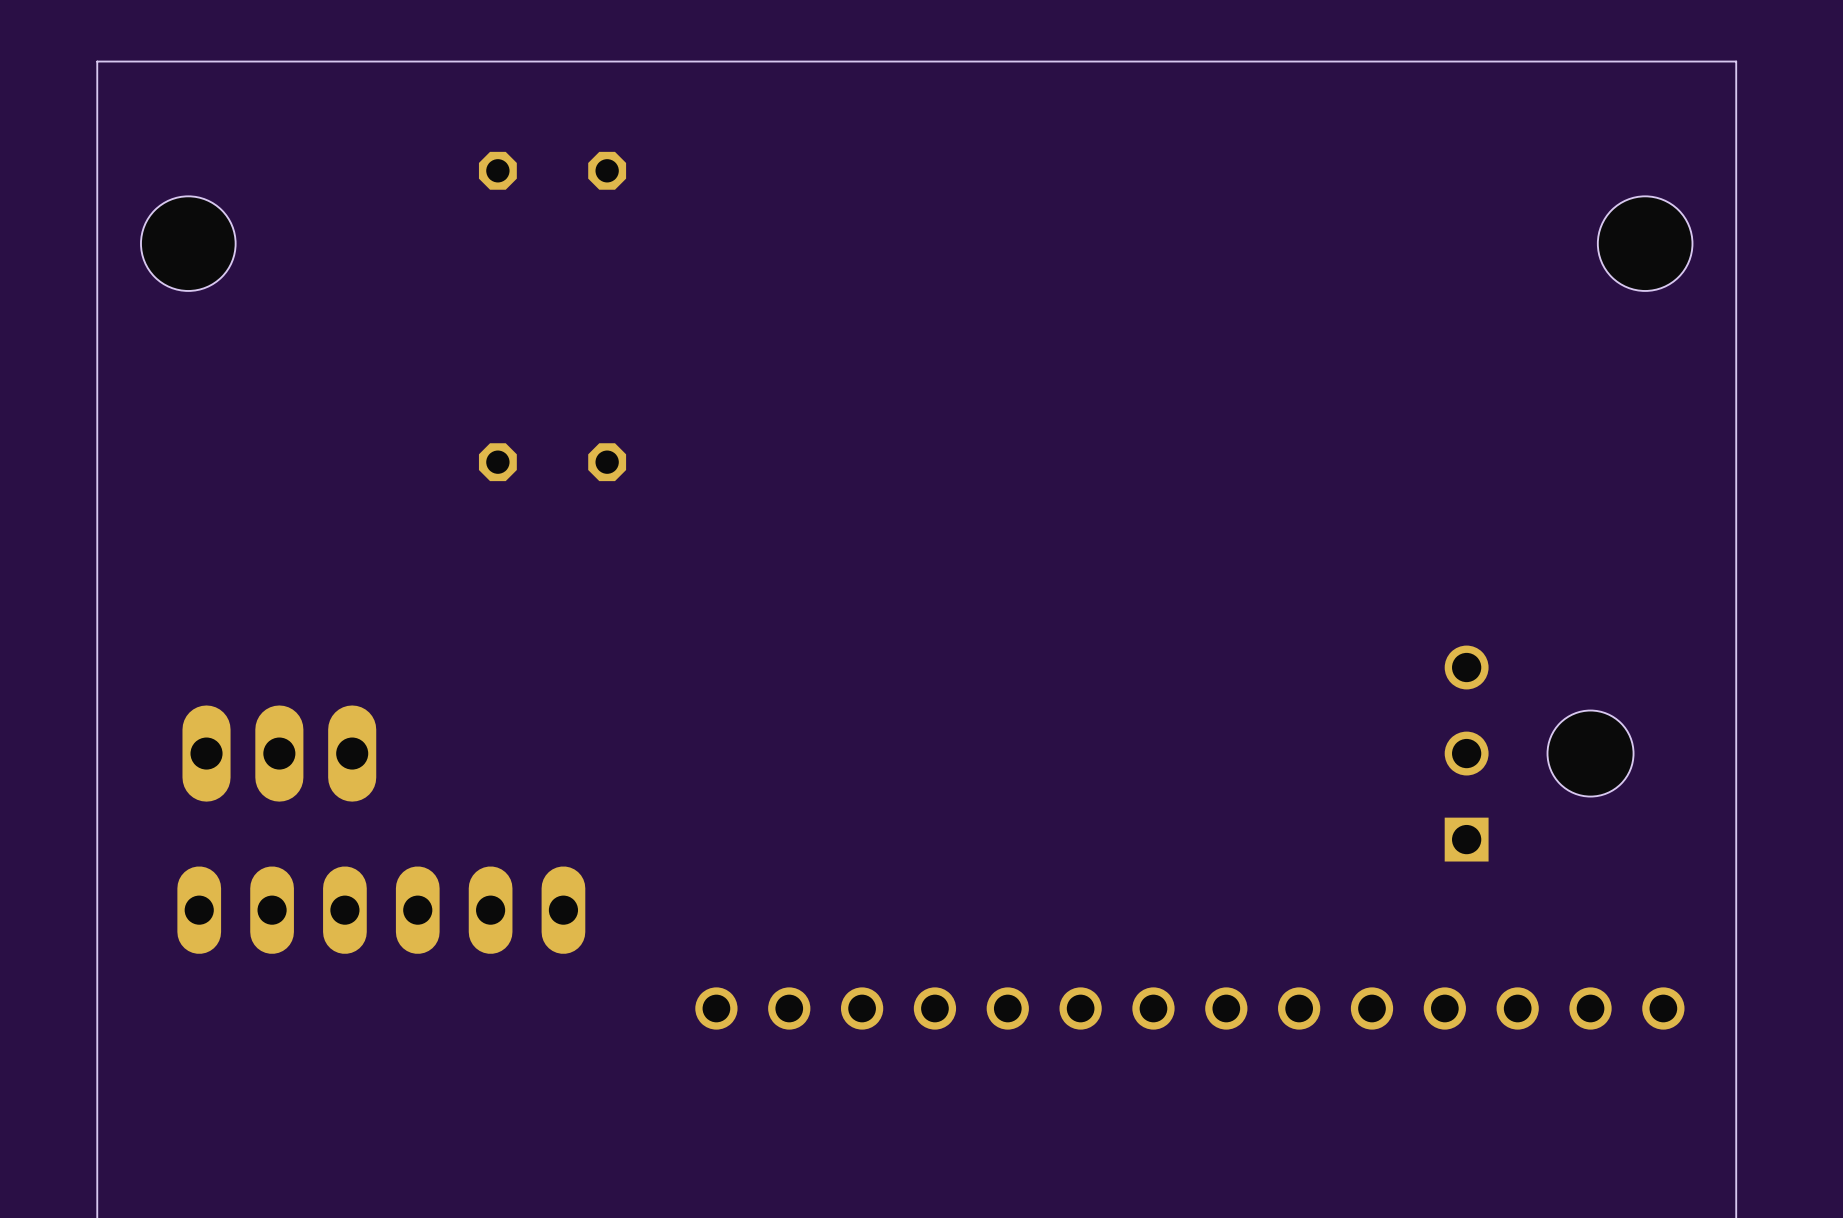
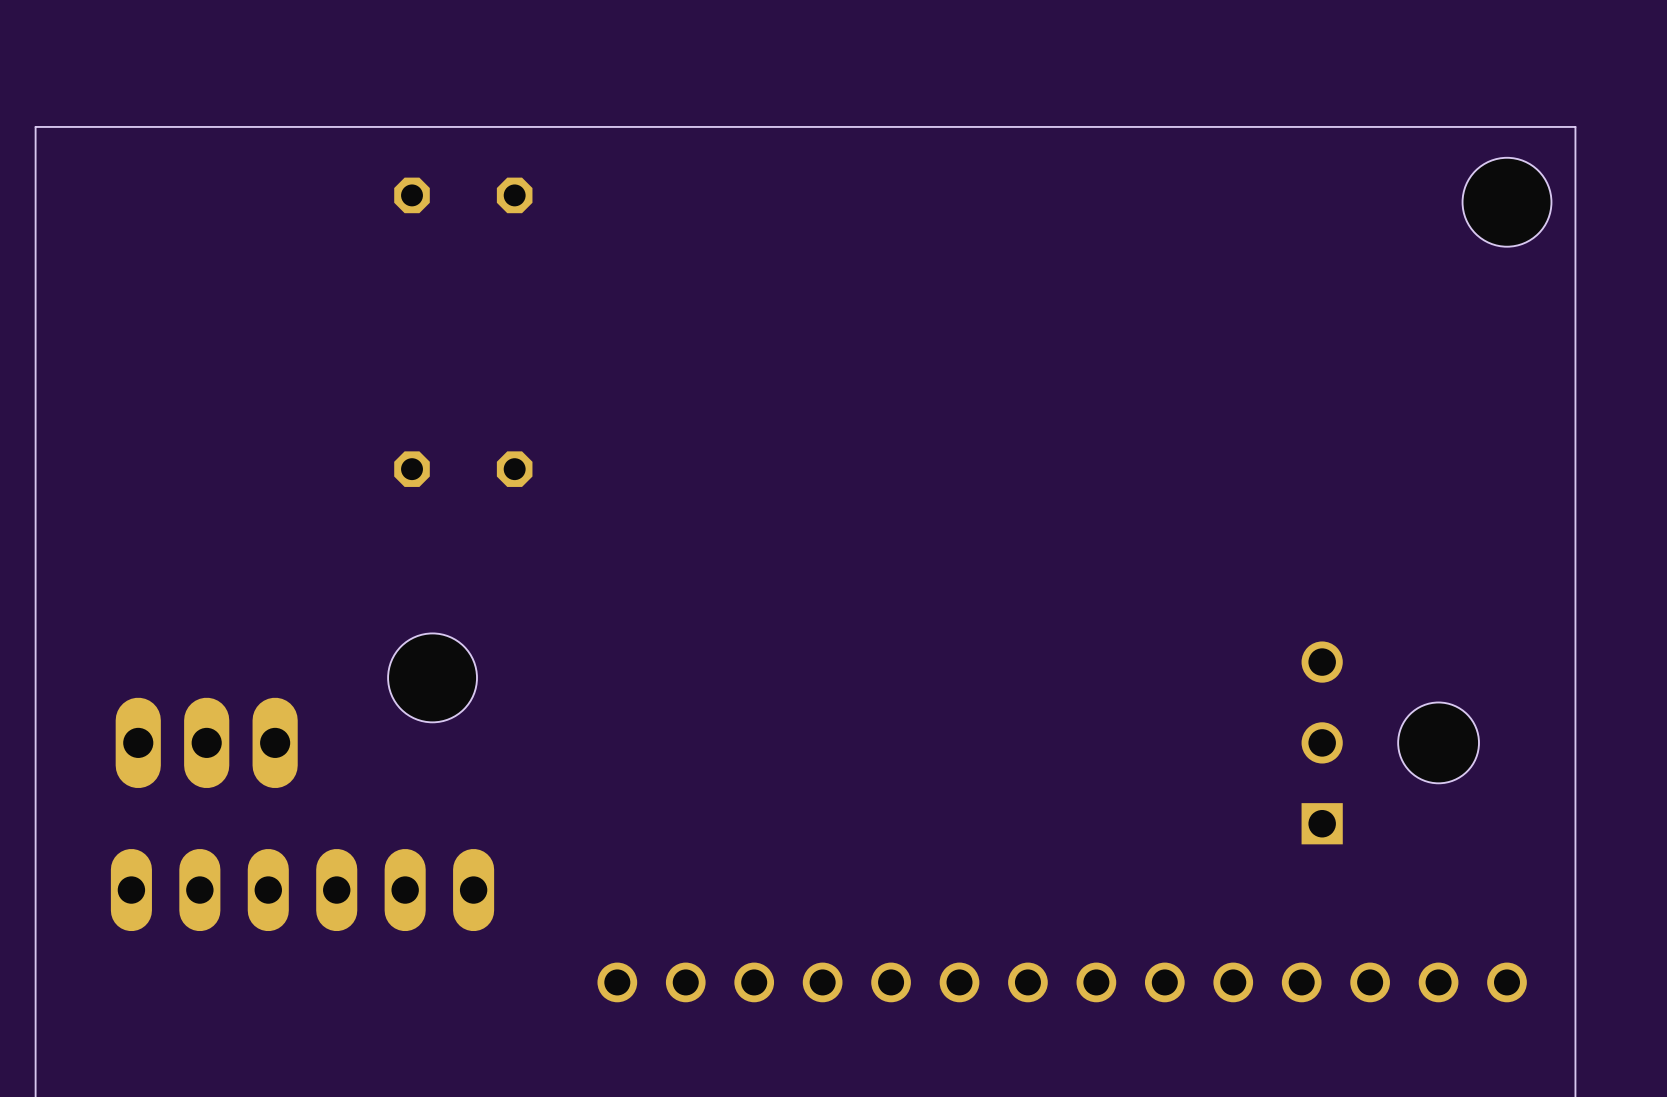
board edge: (1736, 97) (1736, 61) (97, 61) (97, 97) -> (1575, 126) (35, 126)
hole: (188, 243) -> none
hole position: (1645, 243) -> (1507, 202)
hole: none -> (432, 677)

